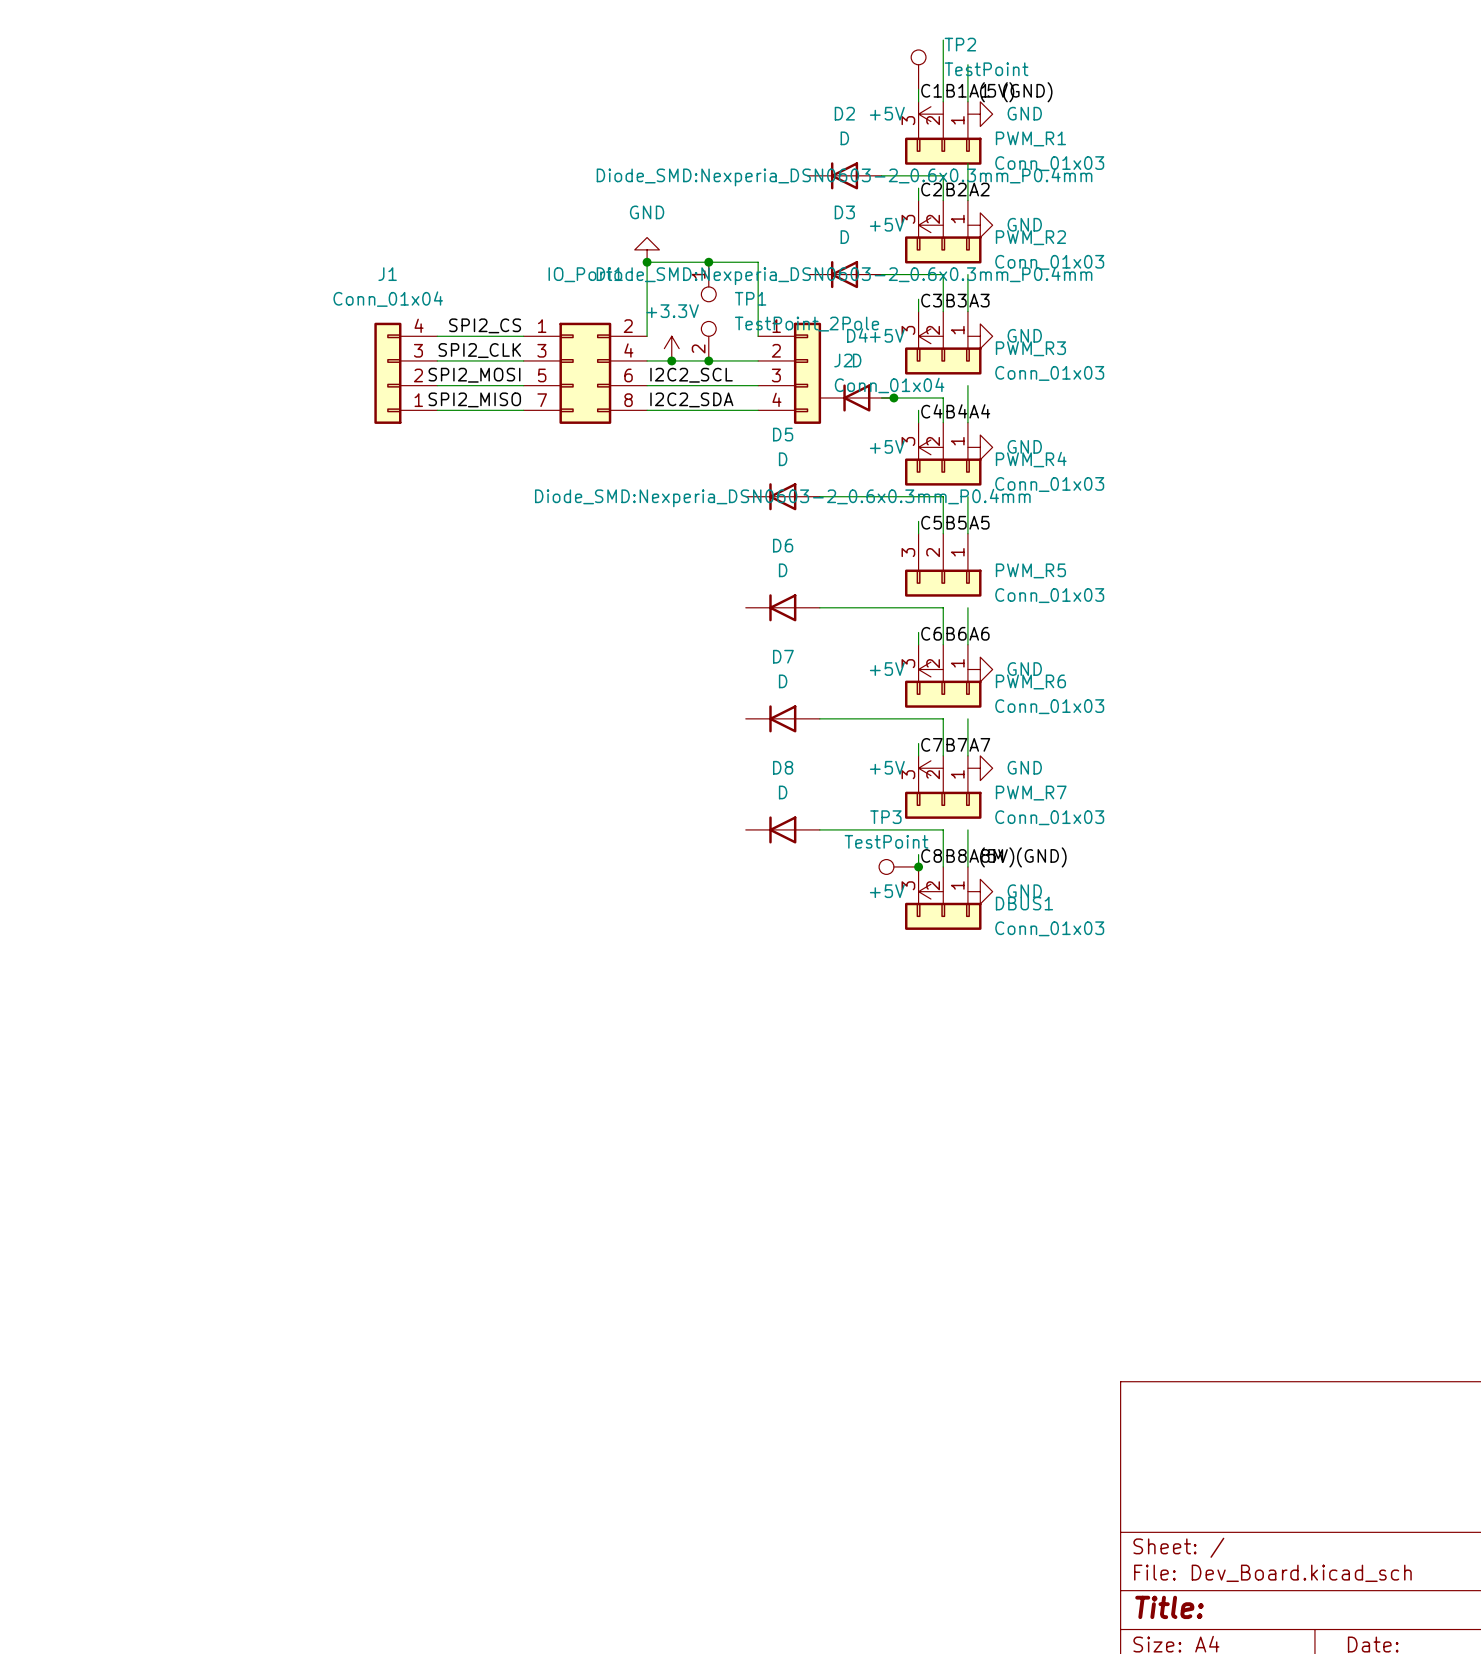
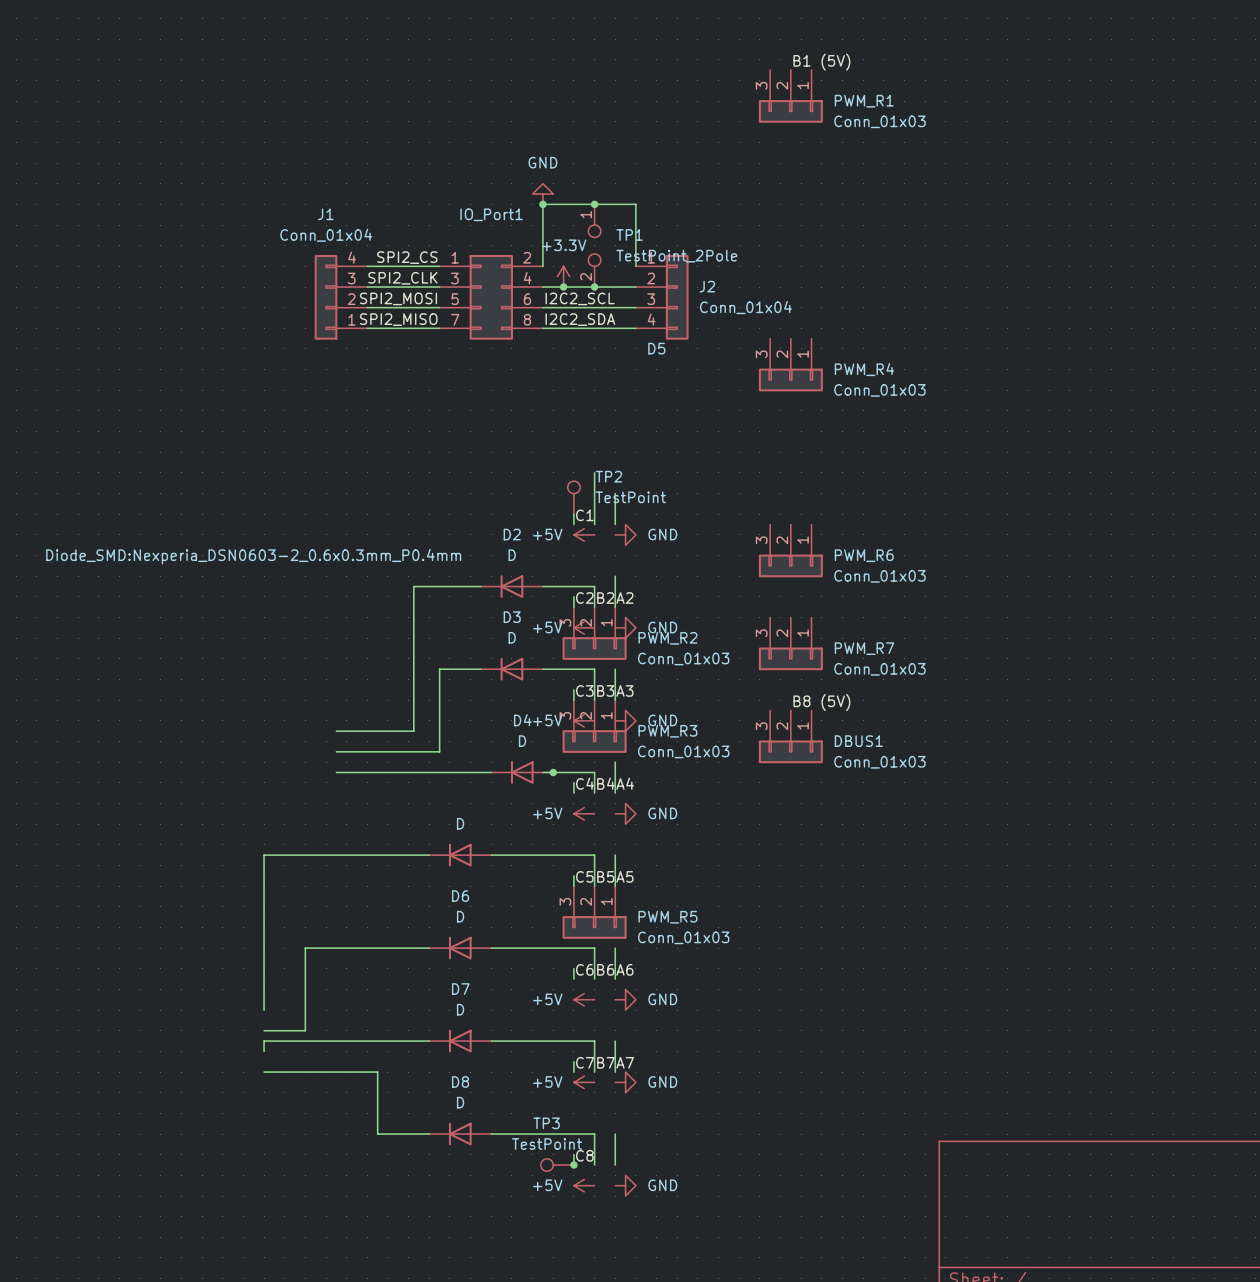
wire: (943, 40) (943, 101) -> none
wire: (967, 64) (967, 101) -> none
TP2 position: (918, 69) -> (573, 497)
wire: (918, 89) (918, 101) -> none
label: C1 (931, 90) -> none
label: A1 (GND) (1010, 92) -> none
power symbol: +5V (930, 114) -> none
power symbol: GND (980, 114) -> none
wire: (967, 163) (967, 200) -> none
D2 position: (844, 175) -> (511, 586)
wire: (881, 175) (943, 175) (943, 200) -> none
D2 text position: Diode_SMD:Nexperia_DSN0603-2_0.6x0.3mm_P0.4mm (844, 177) -> Diode_SMD:Nexperia_DSN0603-2_0.6x0.3mm_P0.4mm (253, 556)
wire: (918, 188) (918, 200) -> none
label: C2 (931, 189) -> none
label: B2 (956, 189) -> none
label: A2 (979, 189) -> none
power symbol: +5V (930, 225) -> none
power symbol: GND (980, 225) -> none
PWM_R2 position: (943, 232) -> (594, 633)
D3 position: (844, 274) -> (511, 669)
wire: (881, 274) (943, 274) (943, 311) -> none
wire: (967, 274) (967, 311) -> none
D3 text: Diode_SMD:Nexperia_DSN0603-2_0.6x0.3mm_P0.4mm (844, 275) -> none
wire: (918, 299) (918, 311) -> none
label: C3 (931, 300) -> none
label: B3 (956, 300) -> none
label: A3 (979, 300) -> none
power symbol: +5V (930, 336) -> none
power symbol: GND (980, 336) -> none
PWM_R3 position: (943, 343) -> (594, 726)
wire: (967, 385) (967, 422) -> none
D4 position: (856, 397) -> (522, 772)
wire: (881, 397) (943, 397) (943, 422) -> none
junction: (893, 397) -> none
wire: (918, 410) (918, 422) -> none
label: C4 (931, 411) -> none
label: B4 (956, 411) -> none
label: A4 (979, 411) -> none
power symbol: +5V (930, 447) -> none
power symbol: GND (980, 447) -> none
D5 position: (782, 496) -> (460, 855)
wire: (819, 496) (943, 496) (943, 533) -> none
wire: (967, 496) (967, 533) -> none
D5 text: Diode_SMD:Nexperia_DSN0603-2_0.6x0.3mm_P0.4mm (782, 498) -> none
wire: (918, 521) (918, 533) -> none
label: C5 (931, 522) -> none
label: B5 (956, 522) -> none
label: A5 (979, 522) -> none
PWM_R5 position: (943, 565) -> (594, 912)
wire: none -> (594, 472) (594, 524)
D6 position: (782, 607) -> (460, 948)
wire: (819, 607) (943, 607) (943, 644) -> none
wire: (967, 607) (967, 644) -> (615, 493) (615, 524)
wire: (918, 632) (918, 644) -> (573, 514) (573, 524)
label: none -> C1 (584, 515)
label: C6 (931, 633) -> none
label: B6 (956, 633) -> none
label: A6 (979, 633) -> none
power symbol: none -> +5V (584, 534)
power symbol: none -> GND (625, 534)
power symbol: +5V (930, 669) -> none
power symbol: GND (980, 669) -> none
wire: none -> (480, 586) (413, 586) (413, 731) (336, 731)
wire: none -> (542, 586) (594, 586) (594, 607)
D7 position: (782, 718) -> (460, 1041)
wire: (819, 718) (943, 718) (943, 755) -> none
wire: (967, 718) (967, 755) -> (615, 576) (615, 607)
label: none -> C2 (584, 598)
label: none -> B2 (605, 598)
label: none -> A2 (624, 598)
wire: (918, 743) (918, 755) -> (573, 596) (573, 607)
label: C7 (931, 744) -> none
label: B7 (956, 744) -> none
label: A7 (979, 744) -> none
power symbol: none -> +5V (584, 627)
power symbol: none -> GND (625, 627)
power symbol: +5V (930, 768) -> none
power symbol: GND (980, 768) -> none
wire: none -> (480, 669) (439, 669) (439, 751) (336, 751)
wire: none -> (542, 669) (594, 669) (594, 700)
D8 position: (782, 829) -> (460, 1134)
wire: (819, 829) (943, 829) (943, 866) -> none
wire: (967, 829) (967, 866) -> (615, 669) (615, 700)
label: none -> C3 (584, 690)
label: none -> B3 (605, 690)
label: none -> A3 (624, 690)
wire: (918, 854) (918, 866) -> (573, 689) (573, 700)
label: C8 (931, 855) -> none
label: A8M (GND) (1018, 857) -> none
TP3 position: (898, 866) -> (557, 1165)
junction: (918, 866) -> none
power symbol: none -> +5V (584, 720)
power symbol: none -> GND (625, 720)
power symbol: +5V (930, 891) -> none
power symbol: GND (980, 891) -> none
wire: none -> (615, 762) (615, 793)
wire: none -> (336, 772) (491, 772)
wire: none -> (542, 772) (594, 772) (594, 793)
junction: none -> (553, 772)
wire: none -> (573, 782) (573, 793)
label: none -> C4 (585, 783)
label: none -> B4 (605, 783)
label: none -> A4 (625, 783)
power symbol: none -> +5V (584, 813)
power symbol: none -> GND (625, 813)
wire: none -> (429, 855) (264, 855) (264, 1010)
wire: none -> (491, 855) (594, 855) (594, 886)
wire: none -> (615, 855) (615, 886)
wire: none -> (573, 875) (573, 886)
label: none -> C5 (584, 876)
label: none -> B5 (605, 876)
label: none -> A5 (624, 876)
wire: none -> (429, 948) (305, 948) (305, 1030) (264, 1030)
wire: none -> (491, 948) (594, 948) (594, 979)
wire: none -> (615, 948) (615, 979)
wire: none -> (573, 968) (573, 979)
label: none -> C6 (584, 969)
label: none -> B6 (605, 969)
label: none -> A6 (624, 969)
power symbol: none -> +5V (584, 999)
power symbol: none -> GND (625, 999)
wire: none -> (429, 1041) (264, 1041) (264, 1051)
wire: none -> (491, 1041) (594, 1041) (594, 1072)
wire: none -> (615, 1041) (615, 1072)
wire: none -> (573, 1061) (573, 1072)
label: none -> C7 (585, 1062)
label: none -> B7 (605, 1062)
label: none -> A7 (625, 1062)
wire: none -> (264, 1072) (377, 1072) (377, 1134) (429, 1134)
power symbol: none -> +5V (584, 1082)
power symbol: none -> GND (625, 1082)
wire: none -> (491, 1134) (594, 1134) (594, 1165)
wire: none -> (615, 1134) (615, 1165)
wire: none -> (573, 1154) (573, 1165)
label: none -> C8 (584, 1155)
junction: none -> (573, 1165)
power symbol: none -> +5V (584, 1185)
power symbol: none -> GND (625, 1185)

